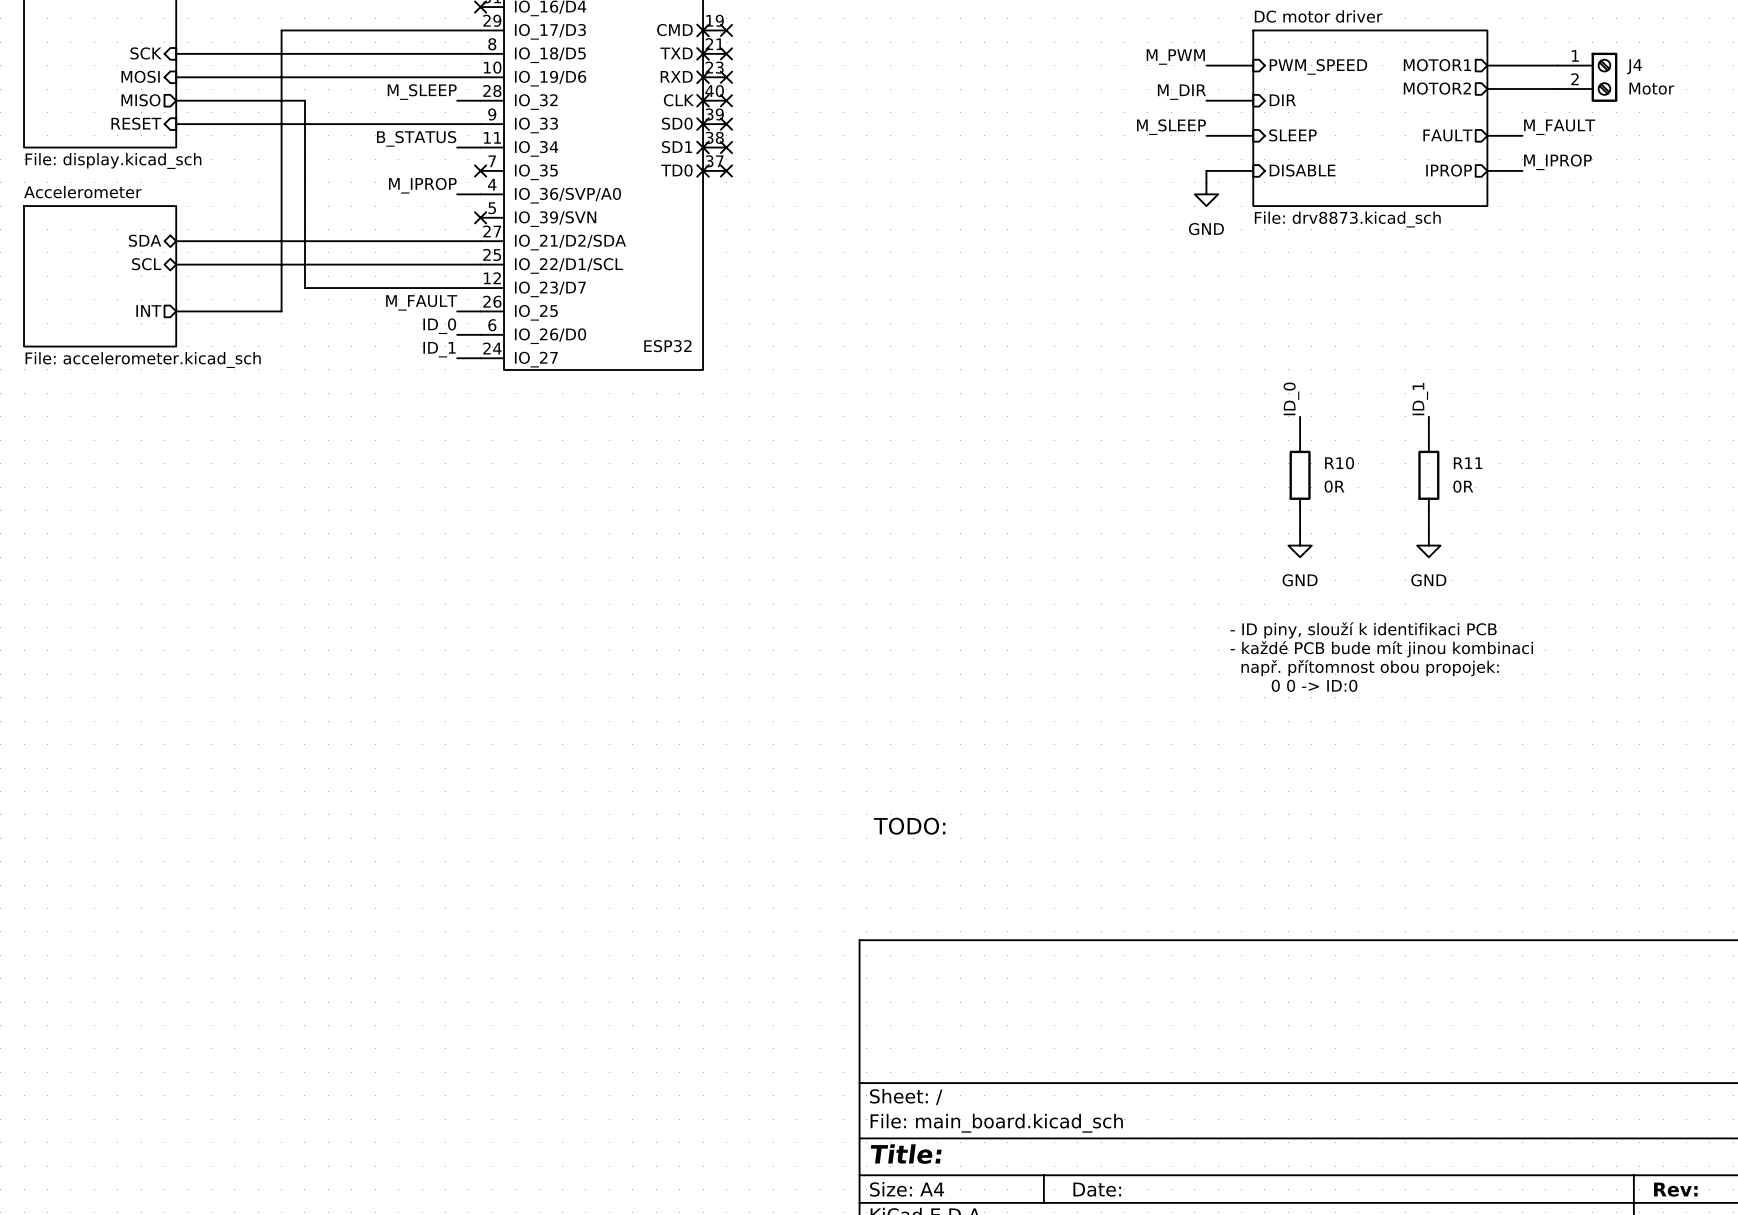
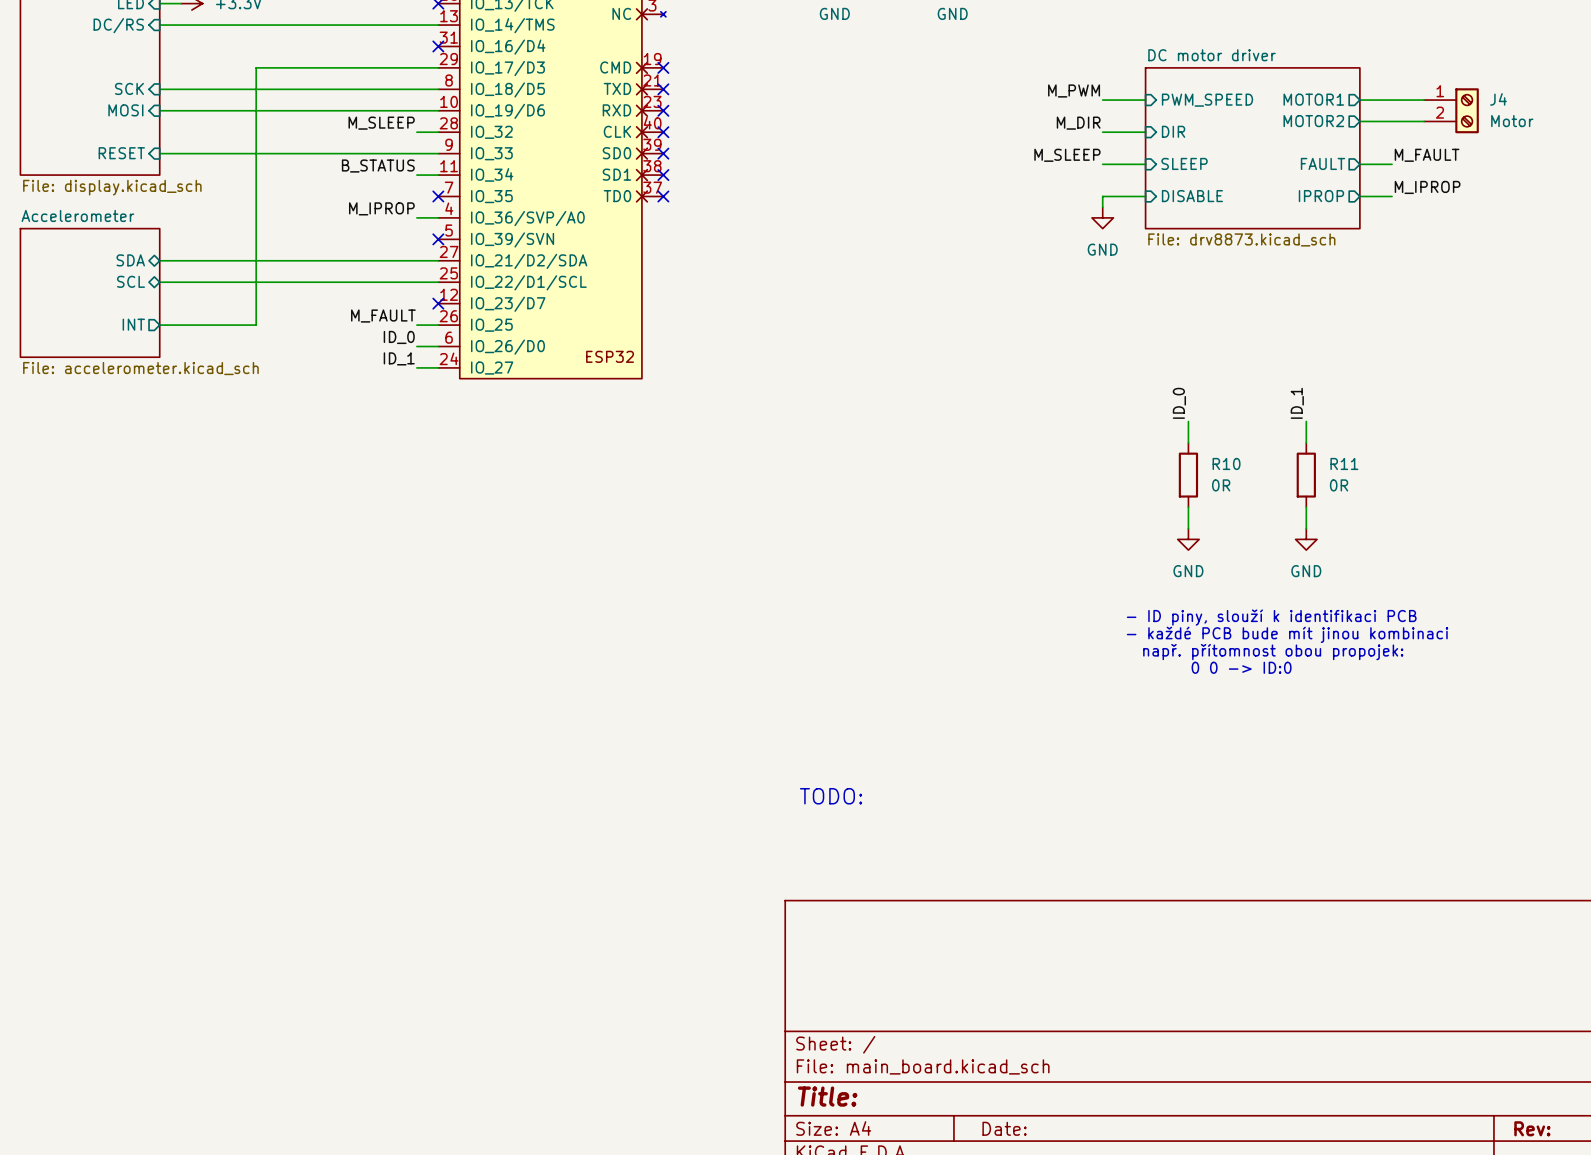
sheet pin: MISO (140, 100) -> none
wire: (176, 100) (304, 100) (304, 288) (480, 288) -> none
no-connect mark: none -> (438, 303)

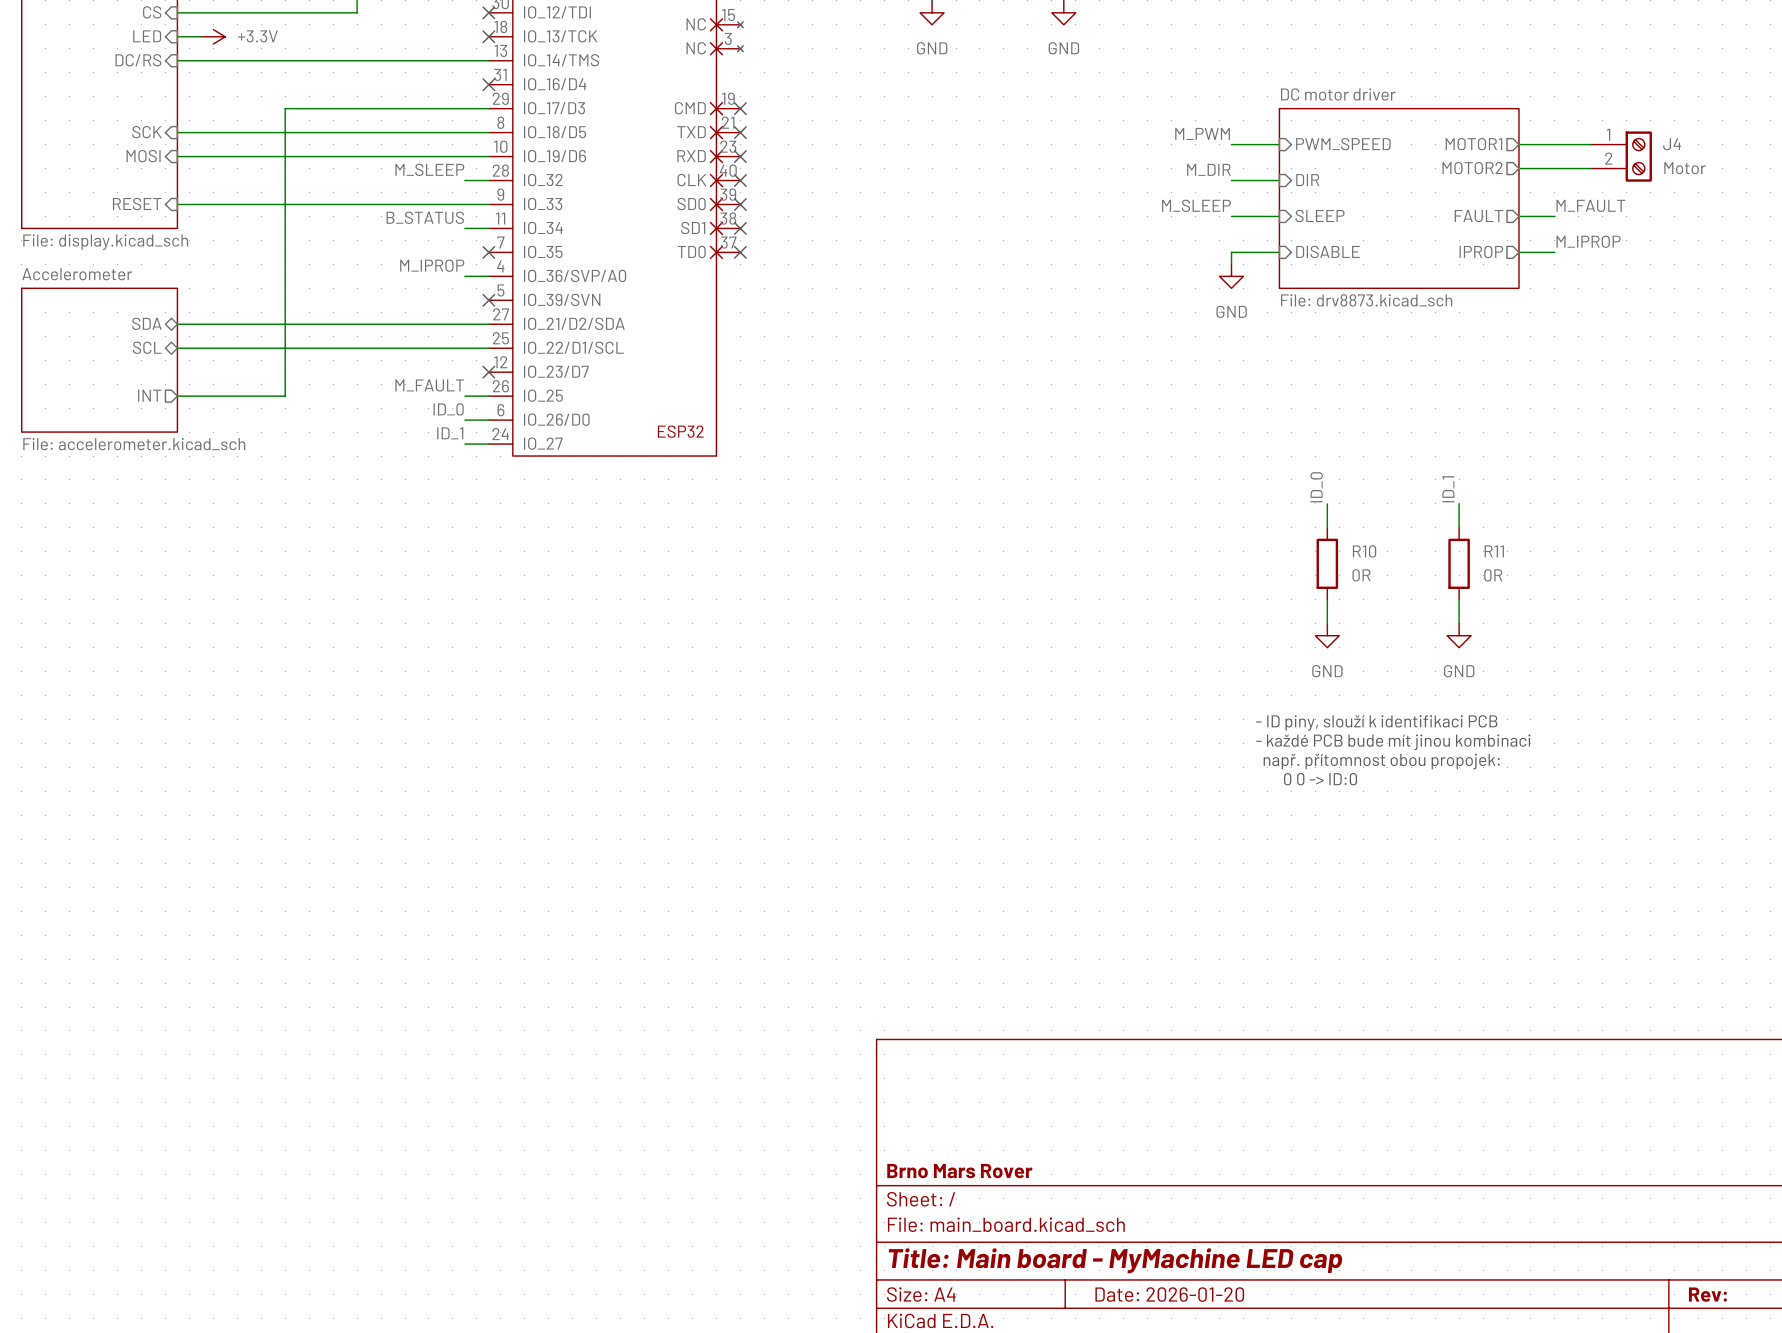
text: TODO: (831, 796) -> none
title block: none -> Brno Mars Rover (959, 1171)
title block: Title: (827, 1096) -> Title: Main board - MyMachine LED cap (1115, 1260)
title block: Date: (1004, 1128) -> Date: 2026-01-20 (1169, 1294)

